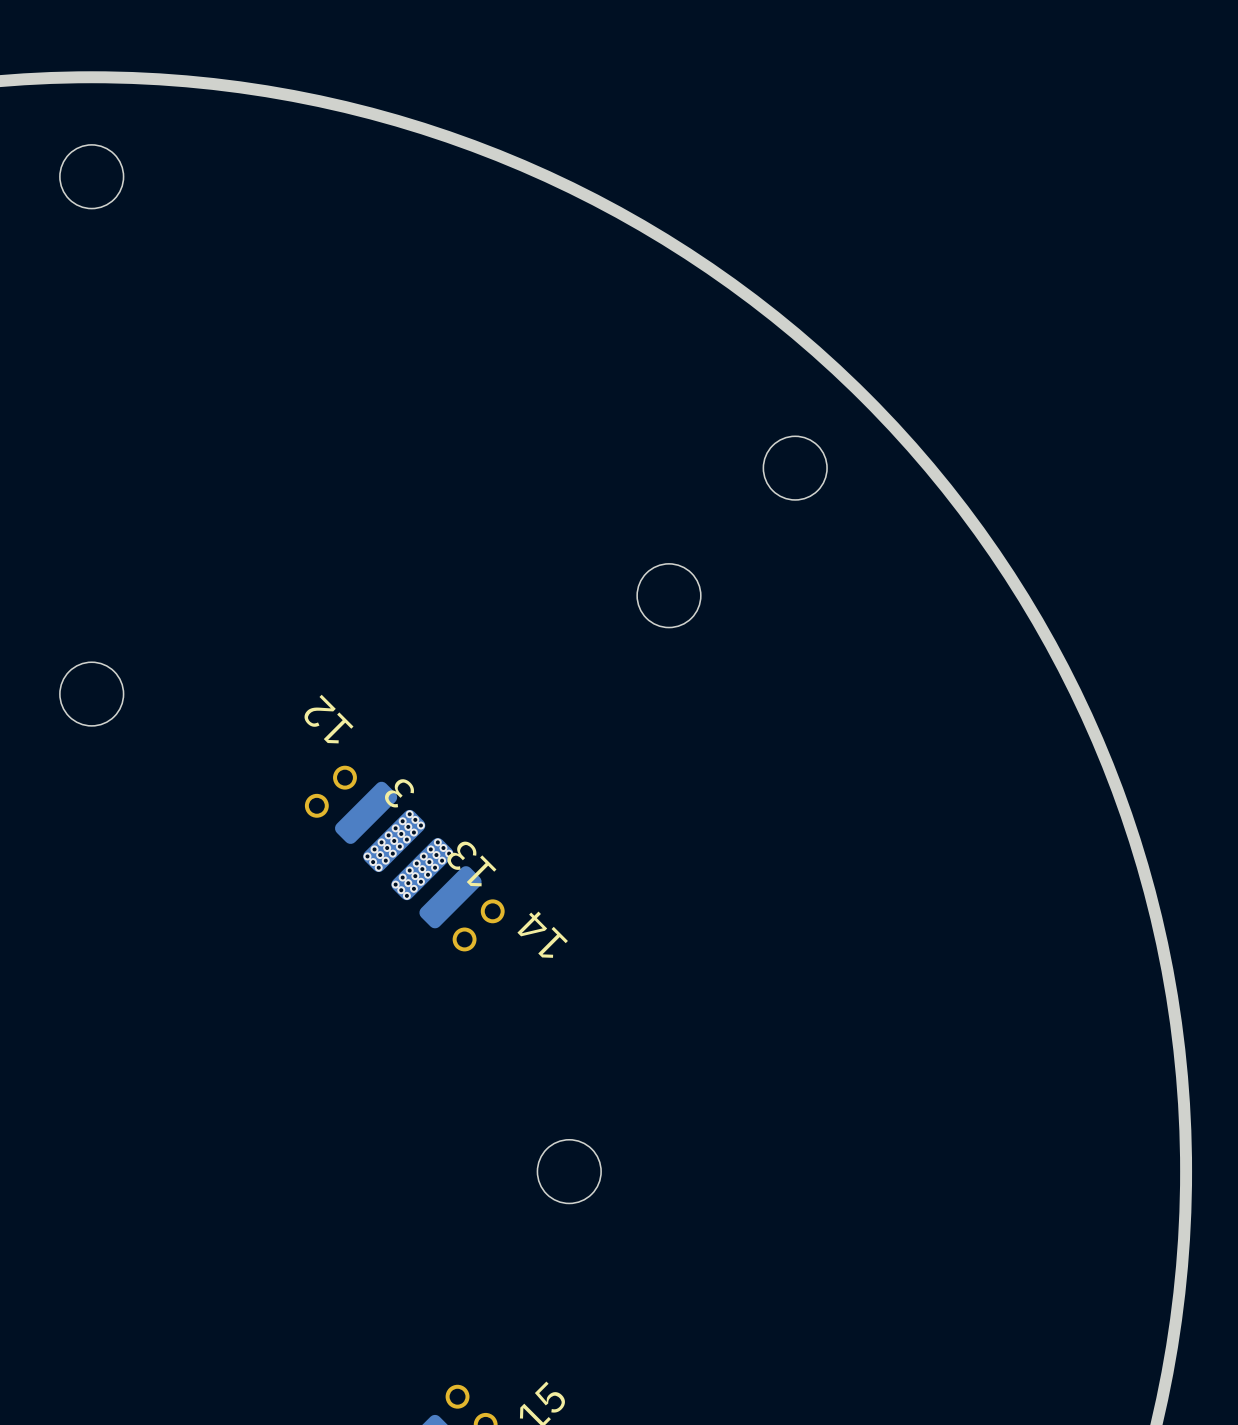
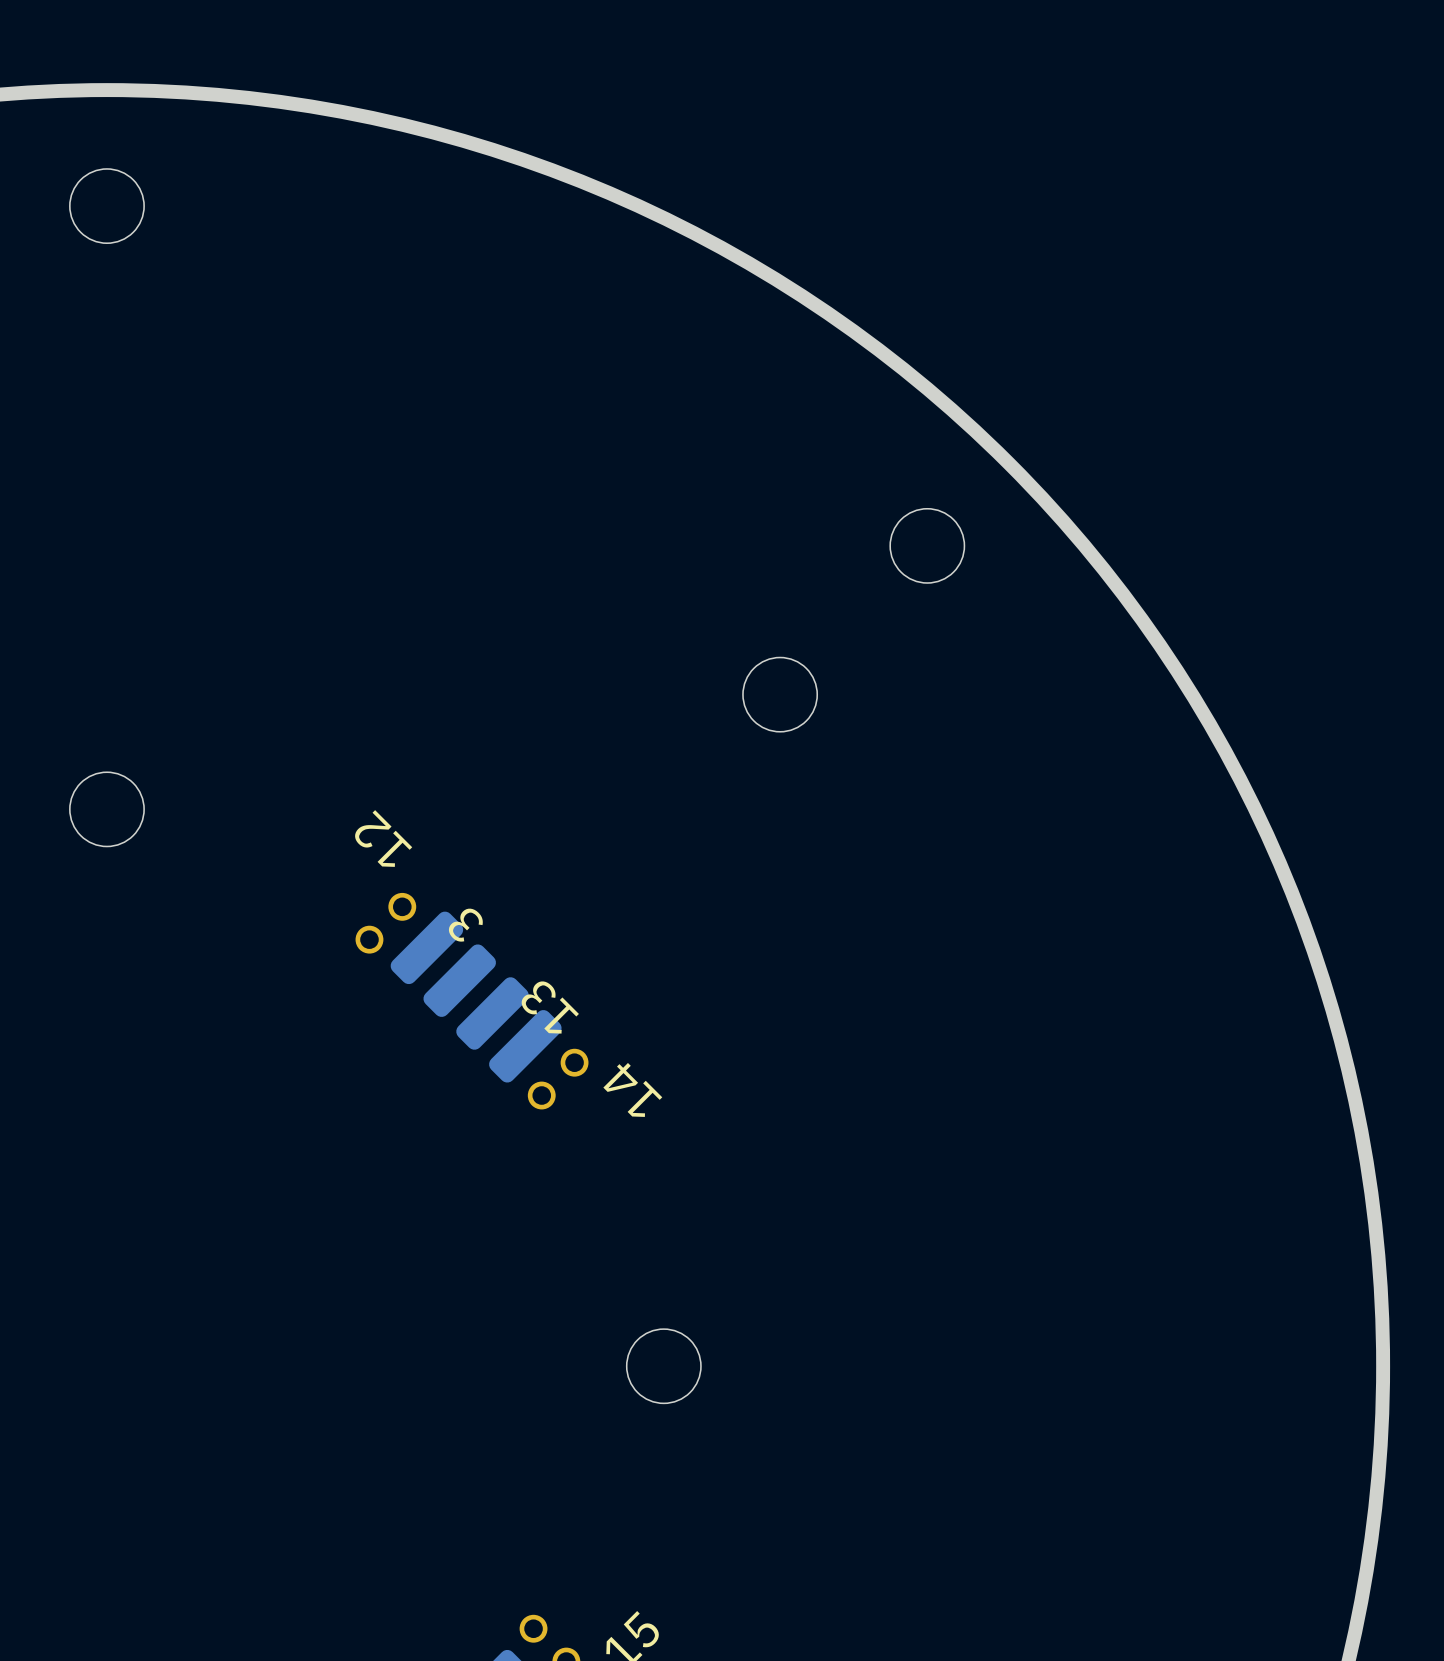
via: (409, 814) -> none
via: (415, 819) -> none
via: (402, 821) -> none
via: (420, 825) -> none
via: (408, 826) -> none
via: (395, 828) -> none
via: (413, 832) -> none
via: (401, 833) -> none
via: (388, 835) -> none
via: (406, 839) -> none
via: (394, 840) -> none
via: (381, 842) -> none
via: (437, 842) -> none
via: (399, 846) -> none
via: (387, 848) -> none
via: (443, 848) -> none
via: (374, 849) -> none
via: (430, 849) -> none
via: (392, 853) -> none
via: (449, 853) -> none
via: (380, 855) -> none
via: (436, 855) -> none
via: (367, 856) -> none
via: (423, 856) -> none
via: (385, 860) -> none
via: (442, 860) -> none
via: (373, 862) -> none
via: (429, 862) -> none
via: (416, 863) -> none
via: (378, 867) -> none
via: (435, 867) -> none
via: (422, 869) -> none
via: (409, 870) -> none
via: (427, 874) -> none
via: (415, 876) -> none
via: (402, 877) -> none
via: (420, 881) -> none
via: (408, 883) -> none
via: (395, 884) -> none
via: (413, 888) -> none
via: (401, 890) -> none
via: (406, 895) -> none

